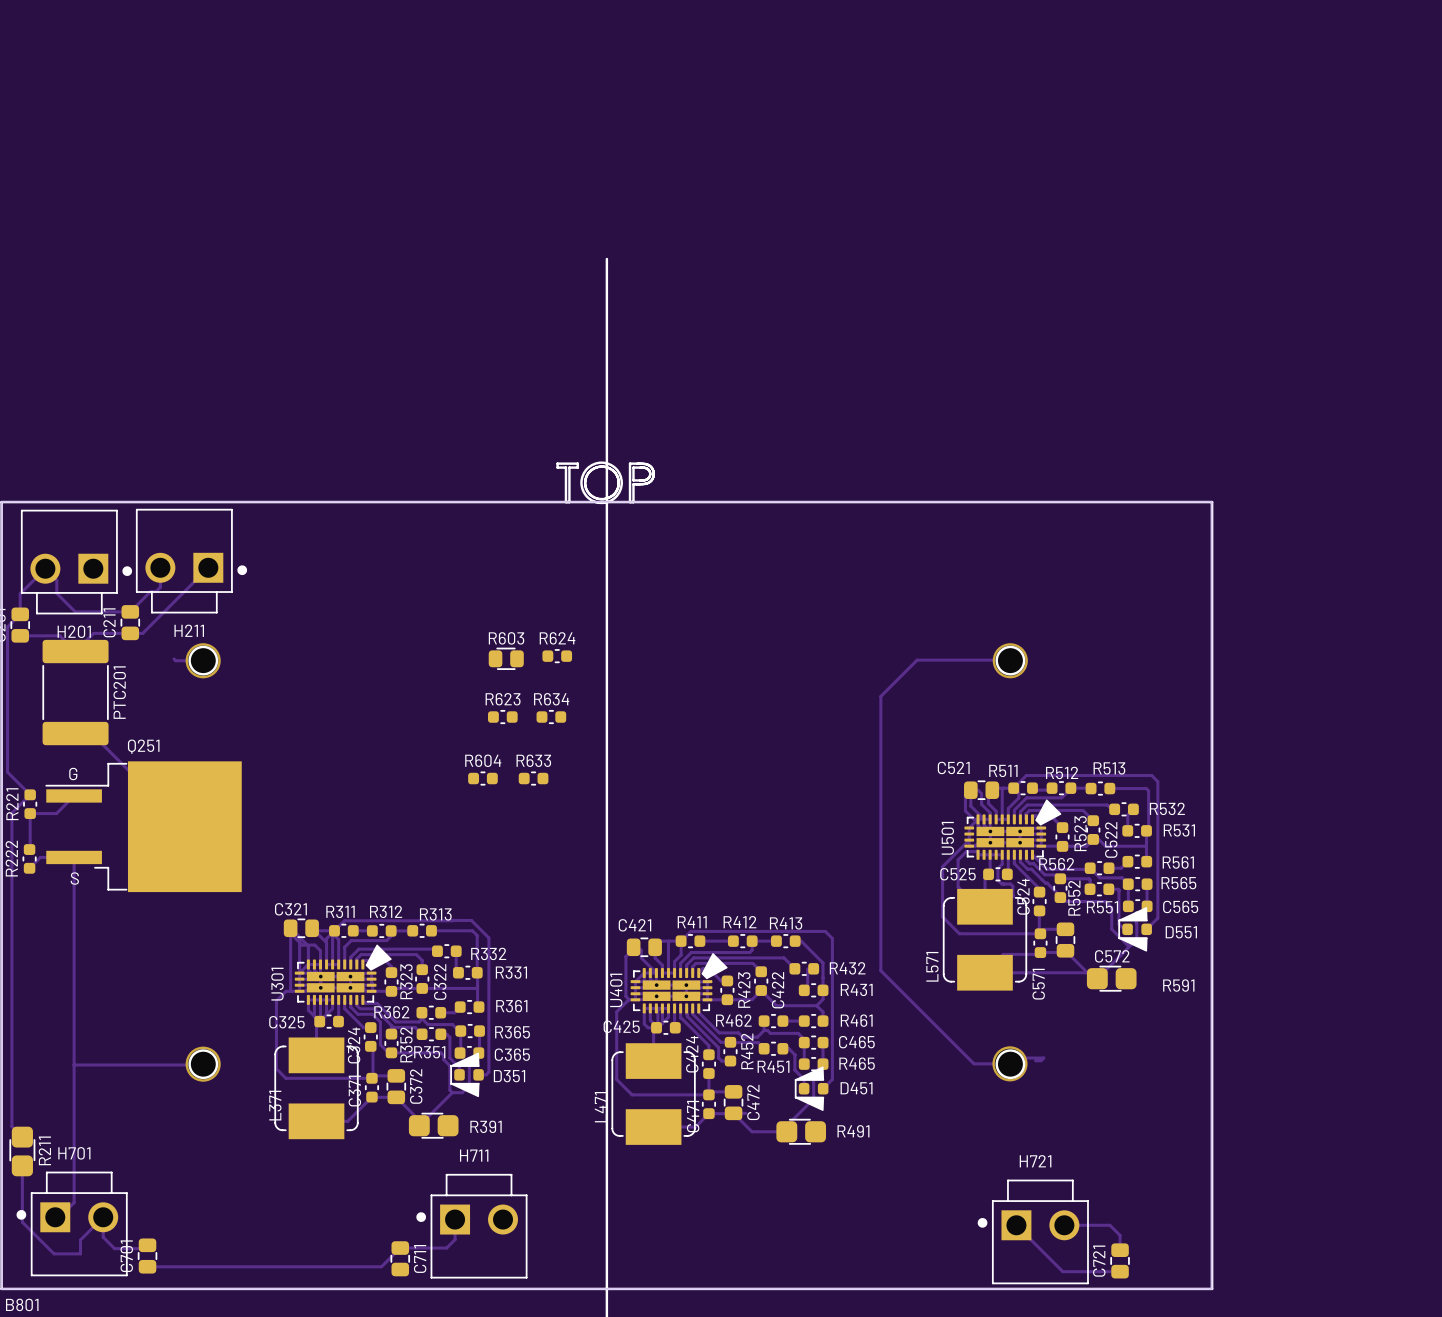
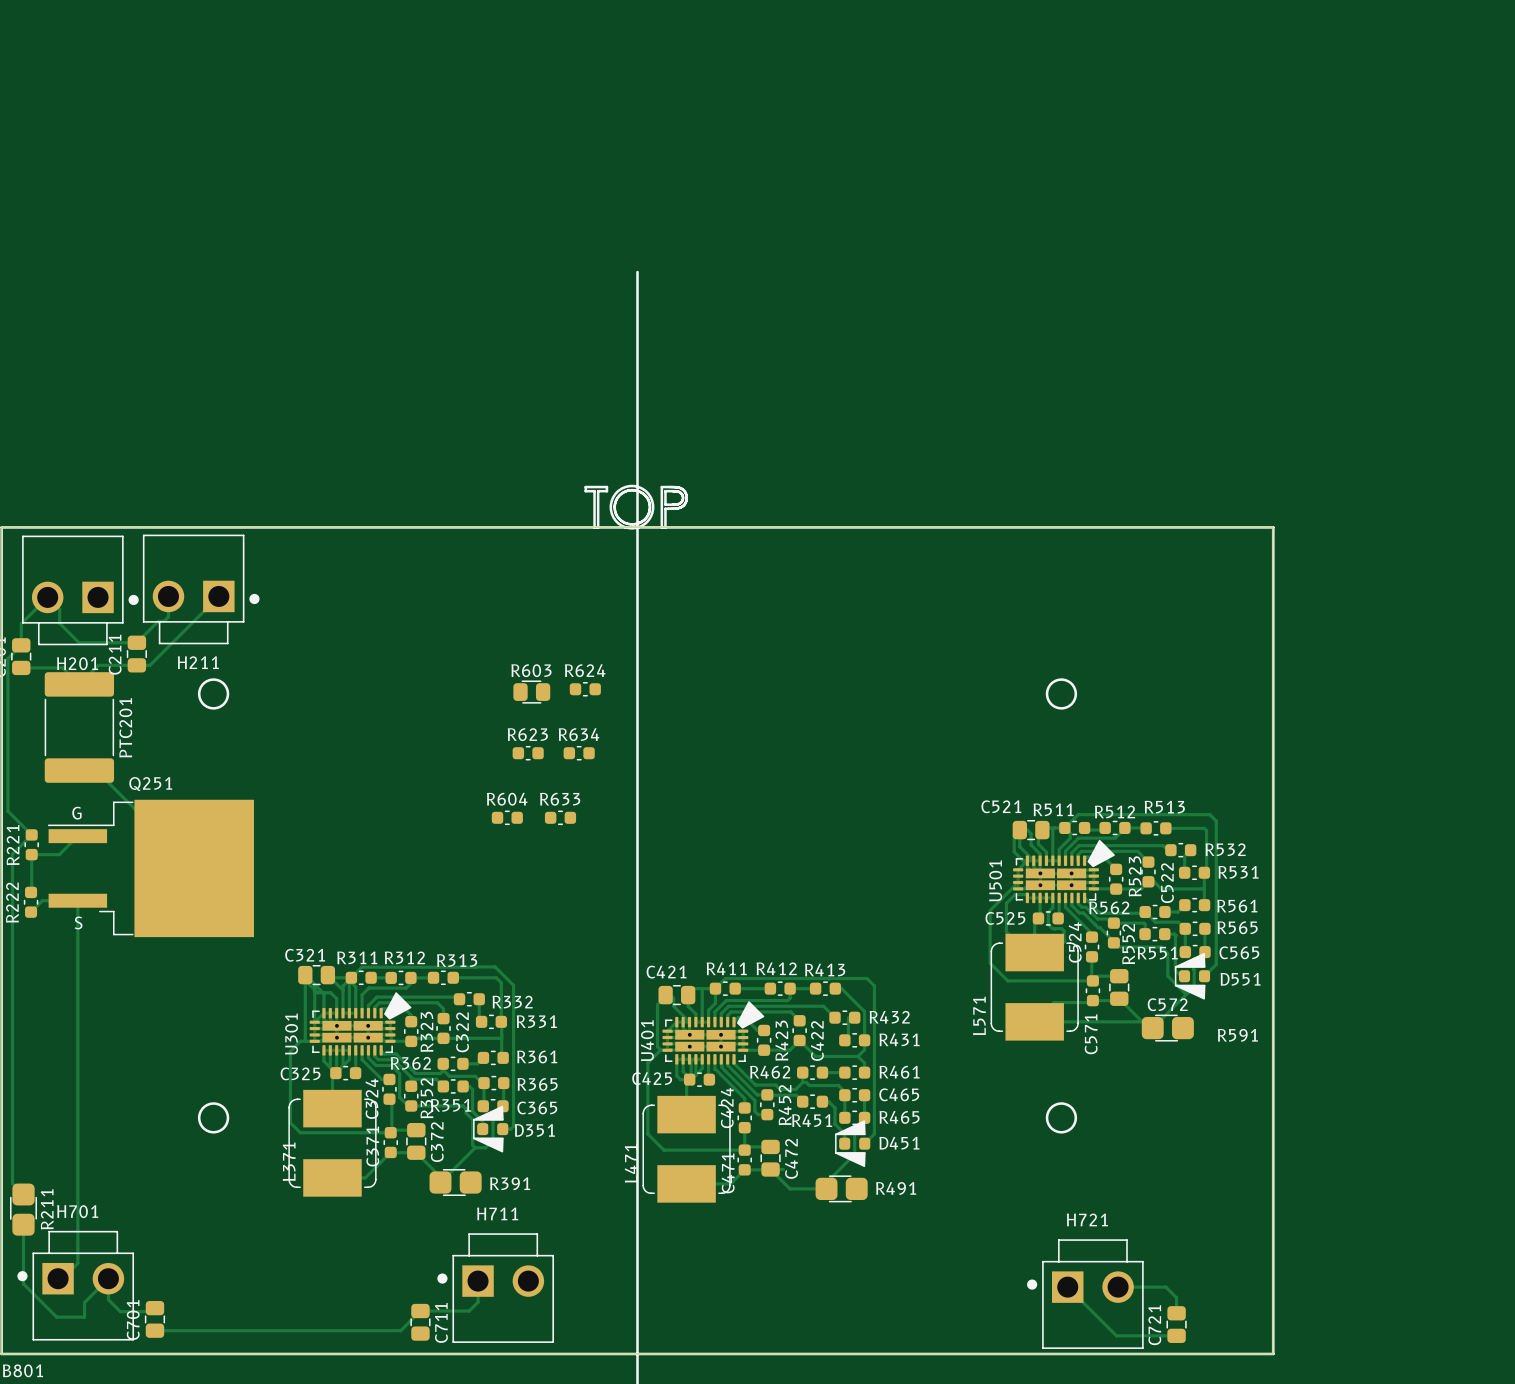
track: (173, 658) (175, 660) (203, 660) -> none
via: (203, 660) -> none
track: (1010, 660) (917, 660) (880, 696) (880, 970) (974, 1063) (1009, 1063) (1015, 1058) (1043, 1058) (1041, 1060) (1035, 1060) -> none
via: (1010, 660) -> none
via: (1009, 1063) -> none
track: (203, 1064) (74, 1065) -> none
via: (203, 1064) -> none

